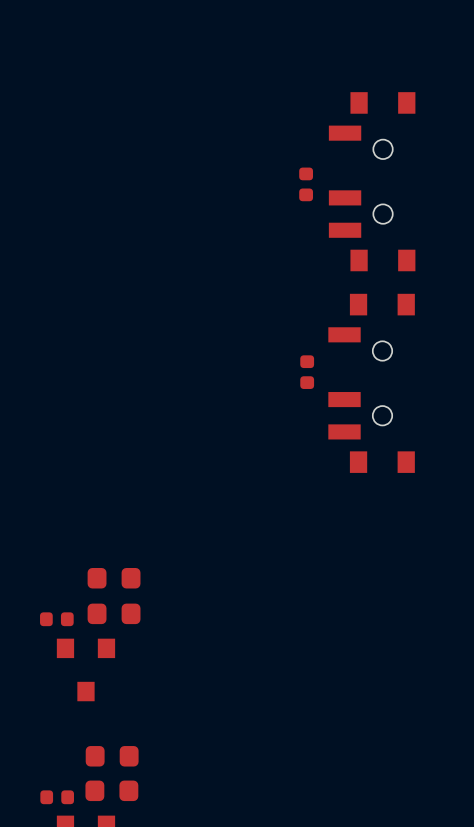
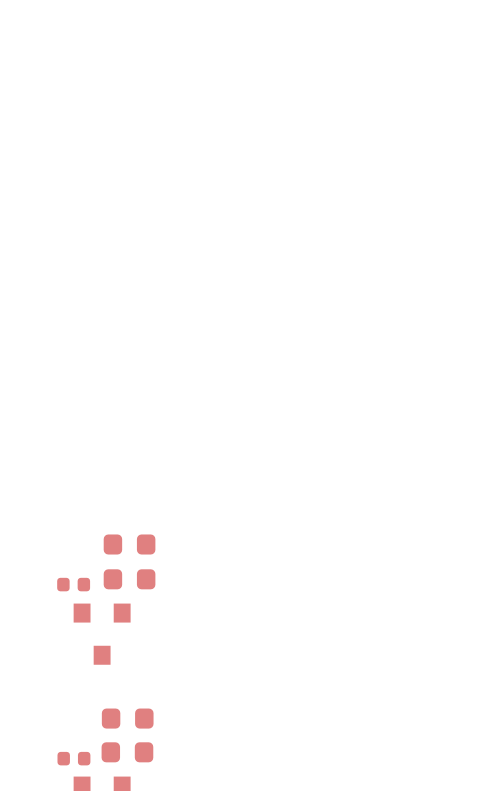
part: (372, 181) -> none
part: (306, 184) -> none
part: (307, 372) -> none
part: (371, 383) -> none

